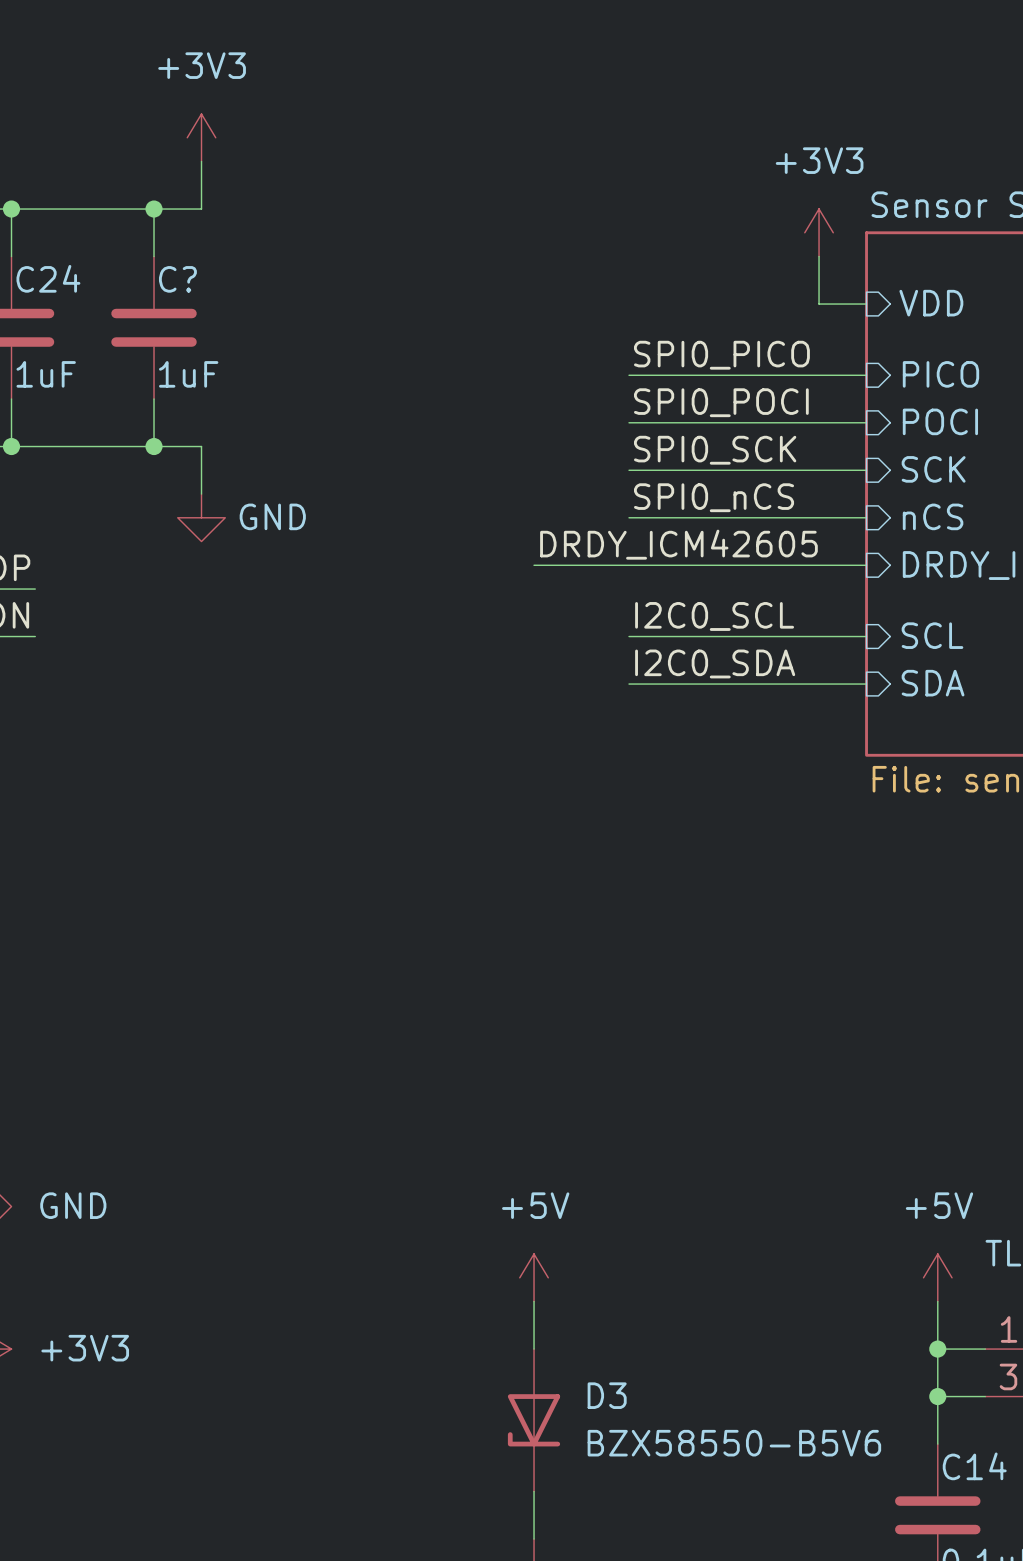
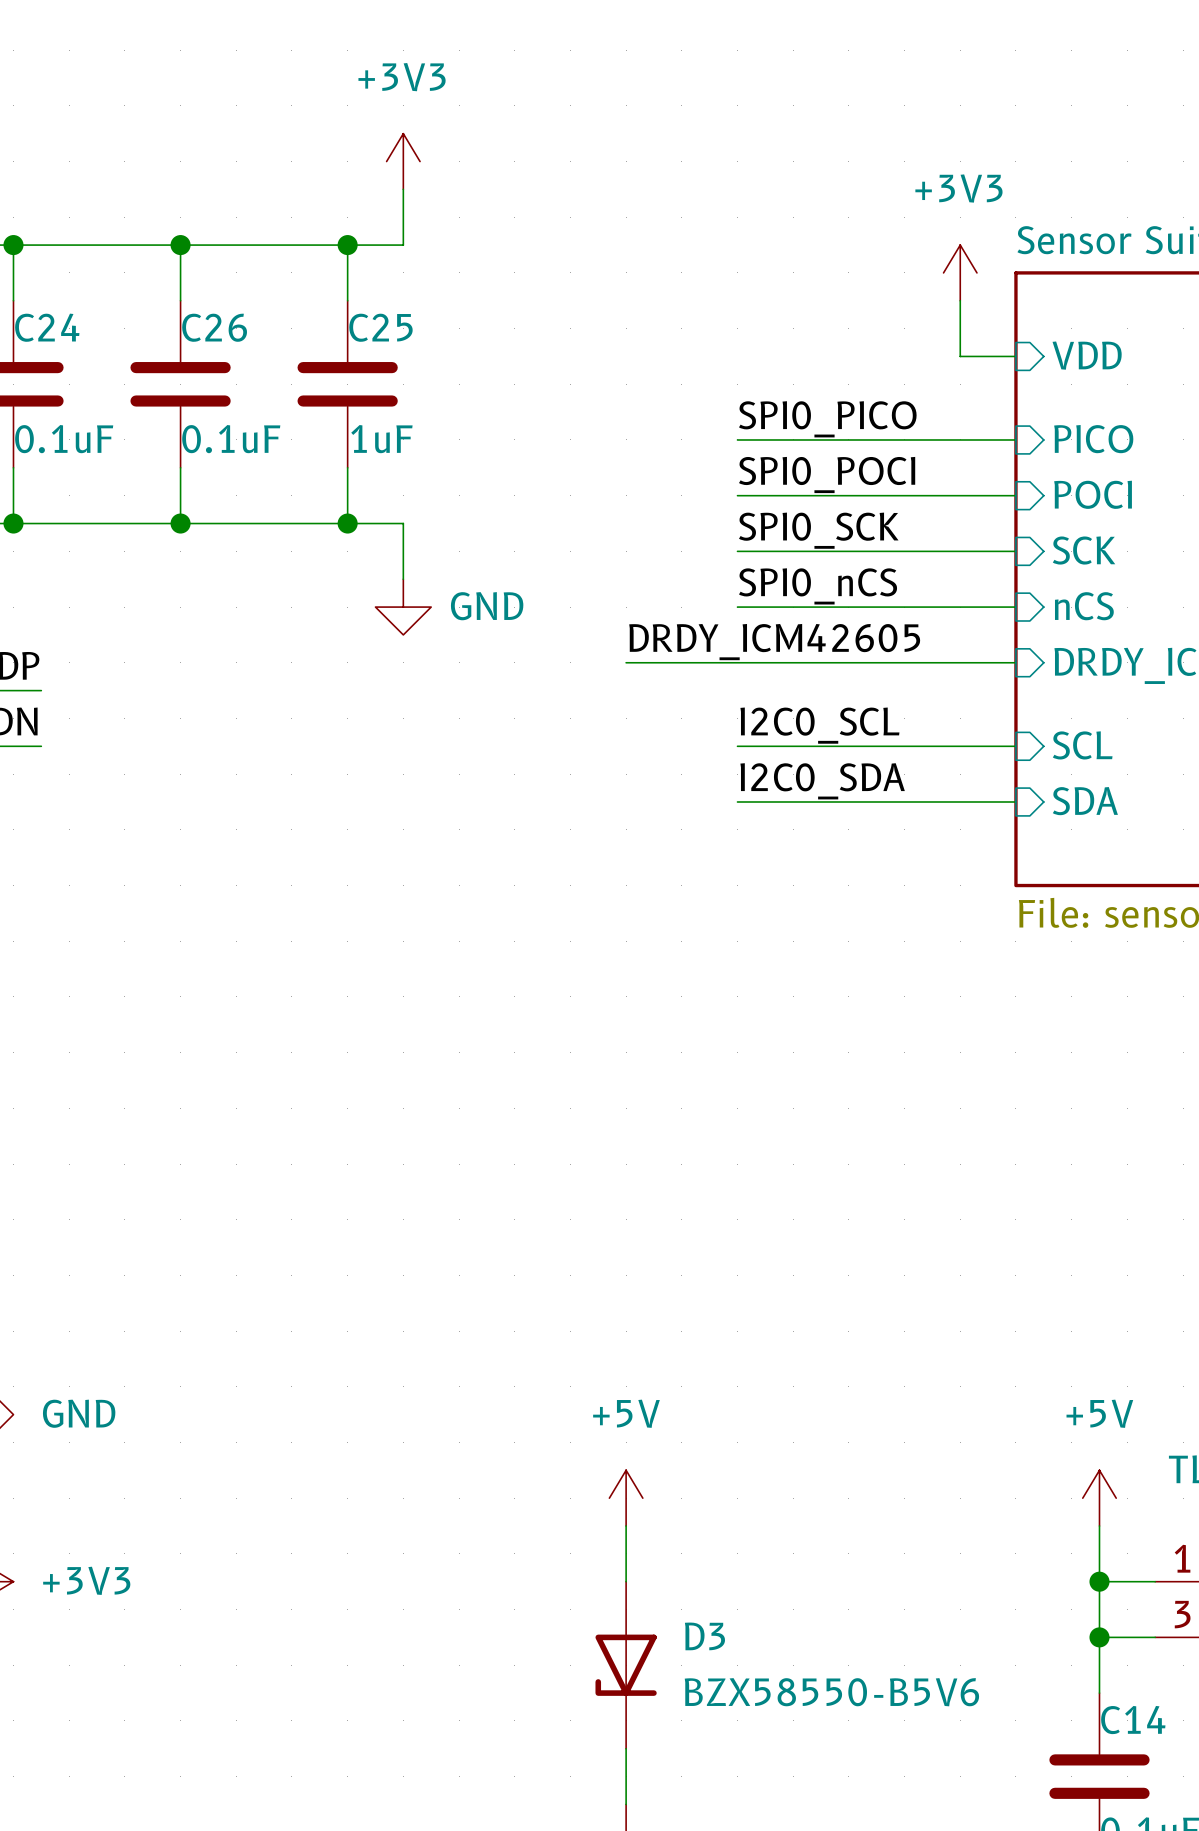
power symbol position: +3V3 (201, 137) -> +3V3 (403, 161)
wire: (201, 161) (201, 209) -> (403, 189) (403, 245) (236, 245)
wire: none -> (347, 245) (347, 300)
junction: none -> (347, 245)
C? name: C? (177, 279) -> C26 (214, 327)
C25: none -> 1uF (347, 384)
C24 value: 1uF (46, 374) -> 0.1uF (64, 439)
C? value: 1uF (188, 374) -> 0.1uF (231, 439)
wire: none -> (347, 467) (347, 523)
wire: (201, 446) (201, 494) -> (236, 523) (403, 523) (403, 579)
junction: none -> (347, 523)
power symbol position: GND (201, 517) -> GND (403, 607)

